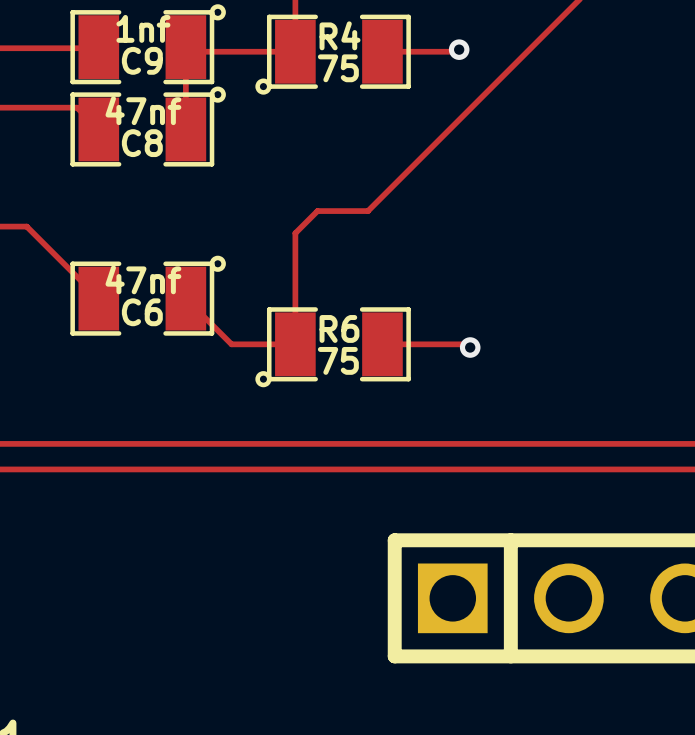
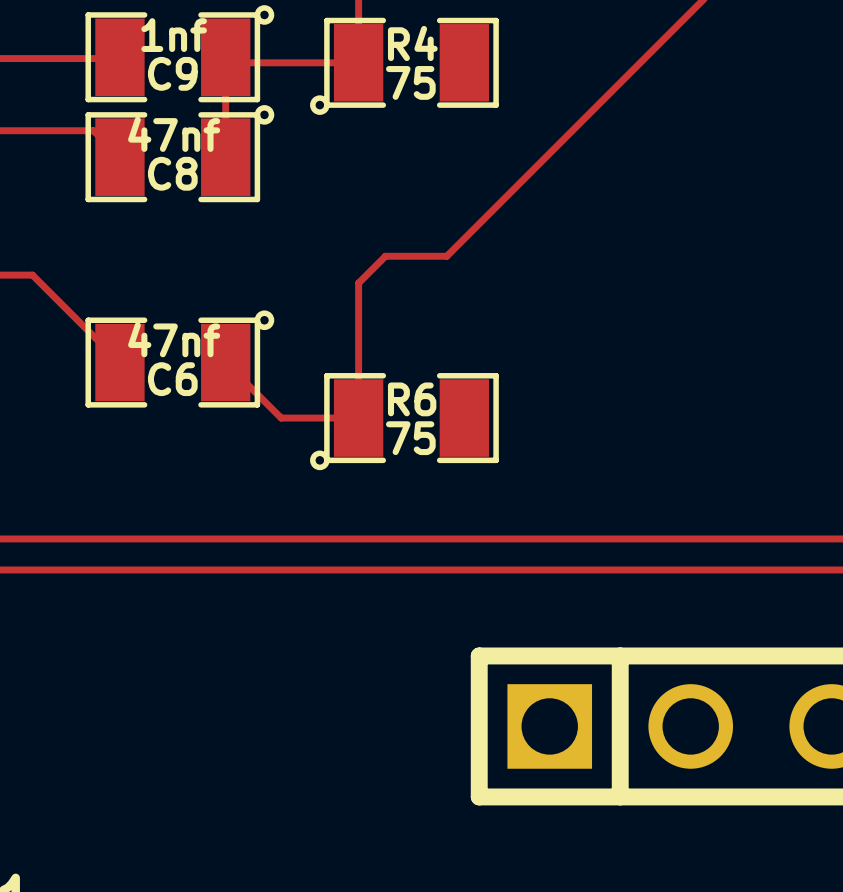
track: (459, 49) (457, 51) (382, 51) -> none
via: (459, 49) -> none
track: (382, 344) (467, 344) (470, 347) -> none
via: (470, 347) -> none

